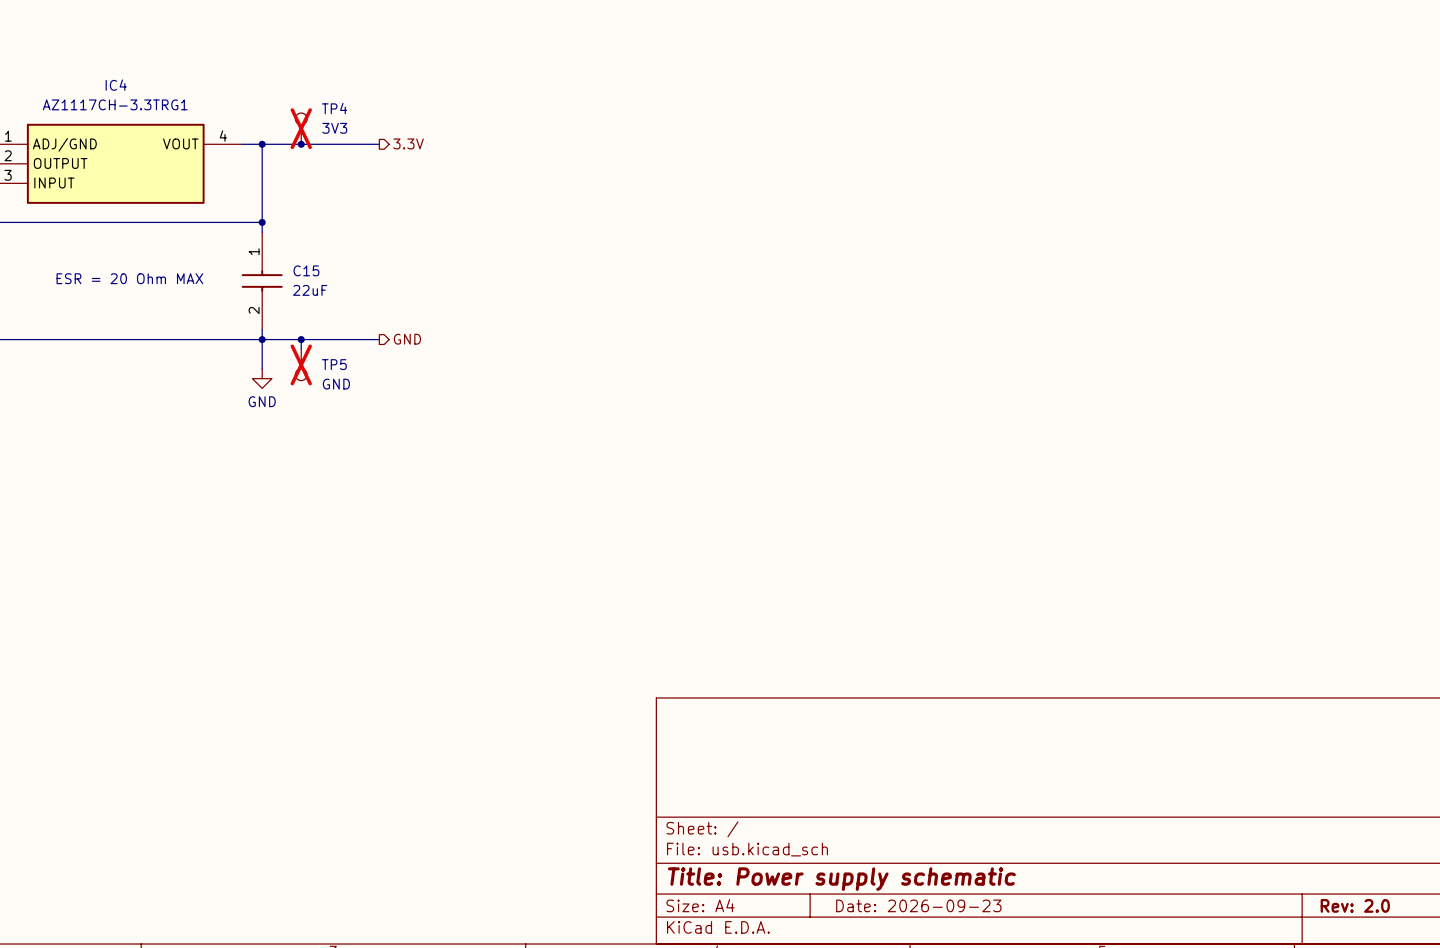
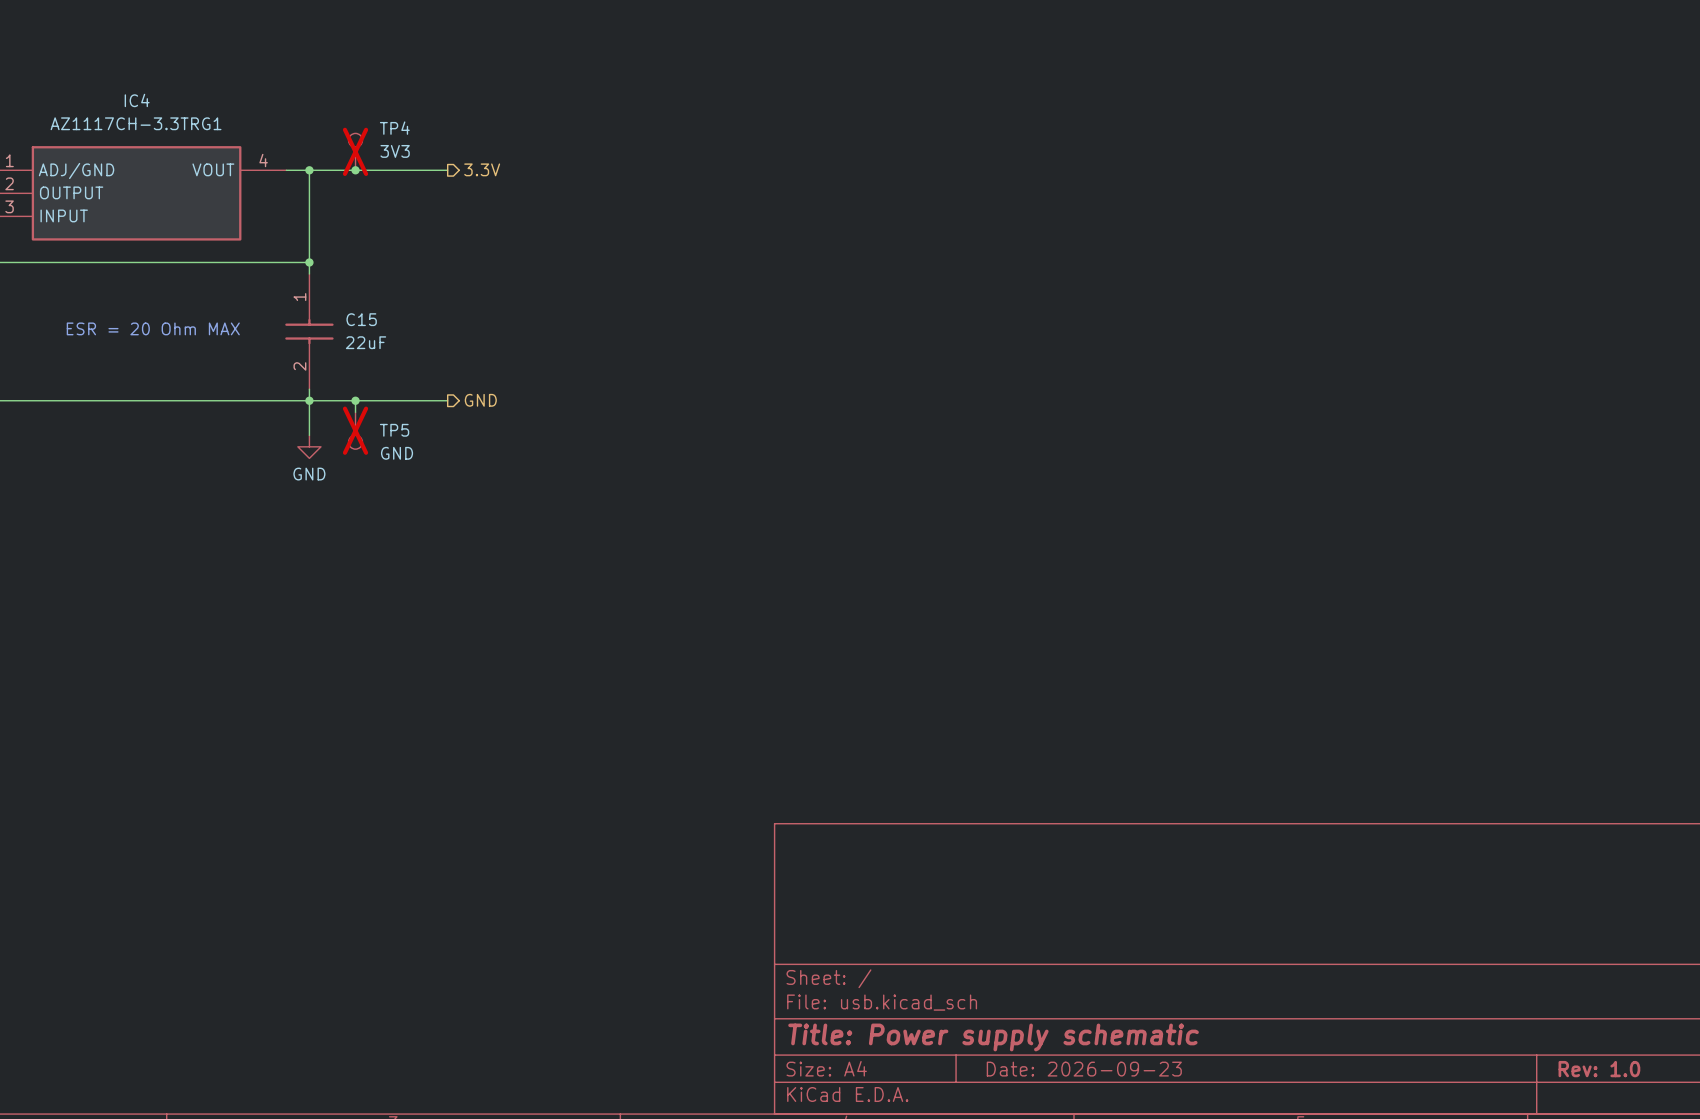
title block: Rev: 2.0 (1355, 905) -> Rev: 1.0 (1599, 1069)

